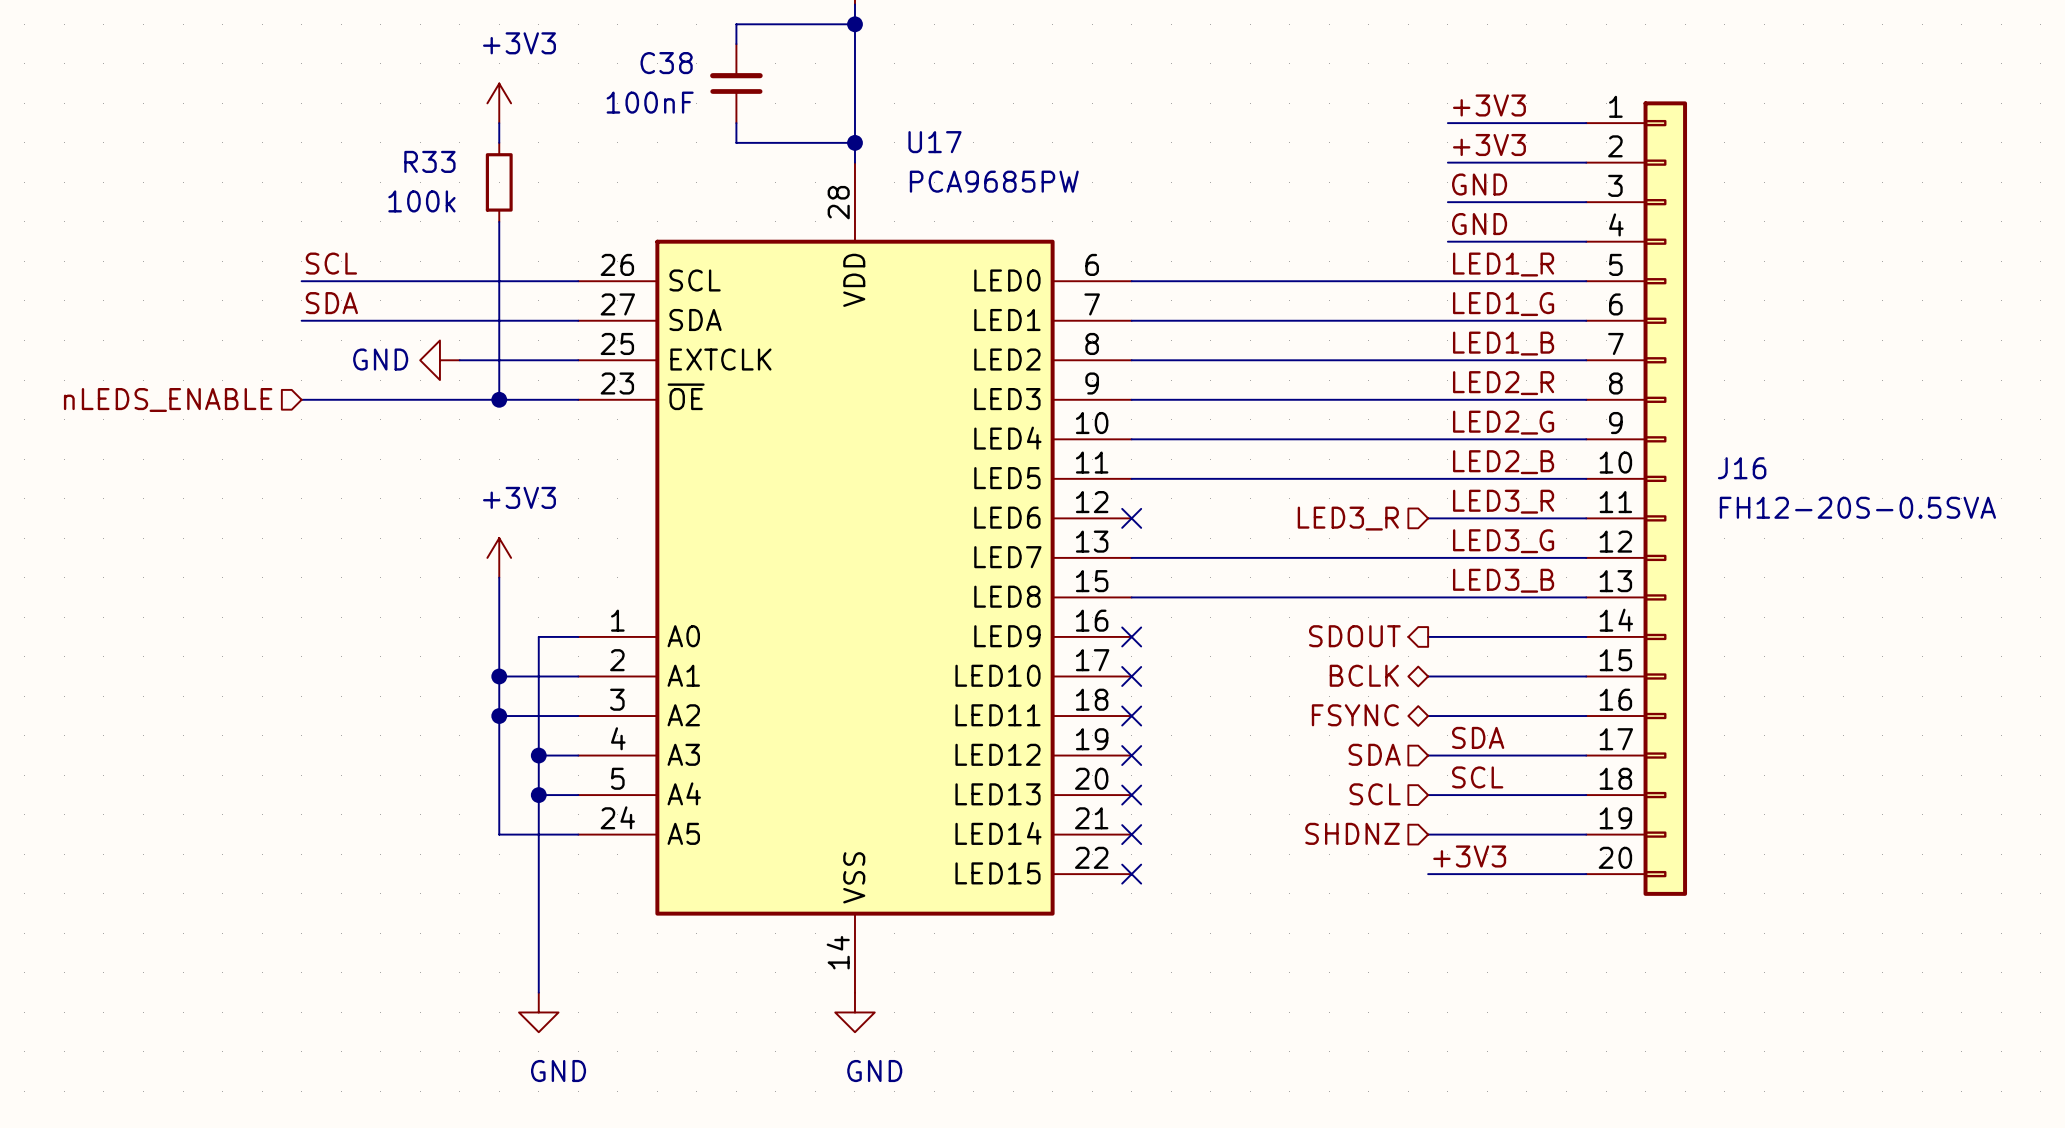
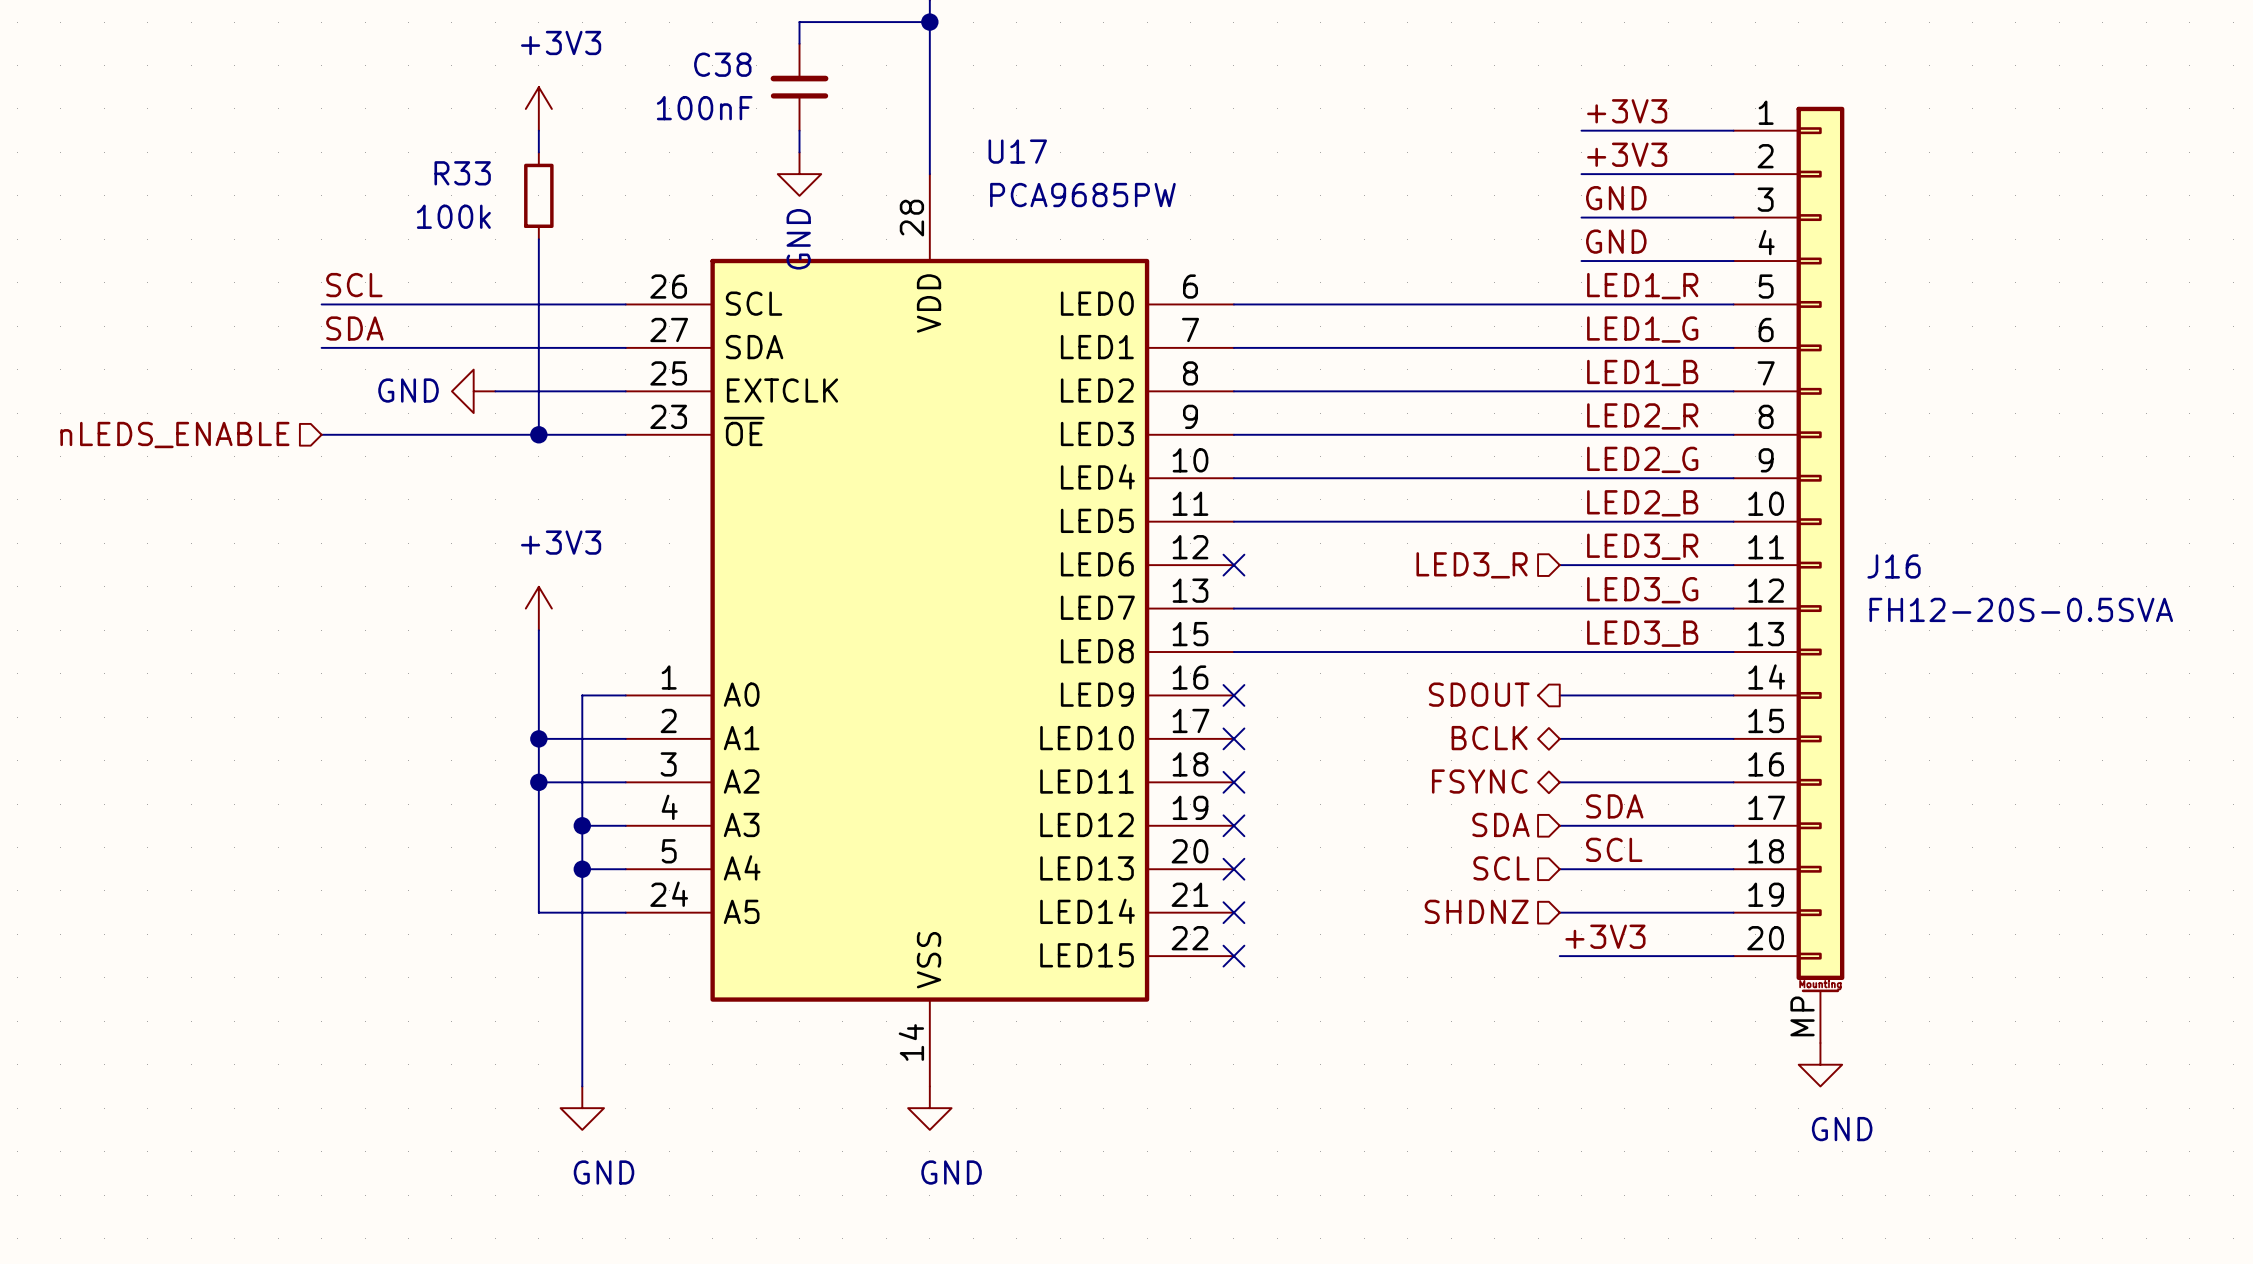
J16 symbol: [1586, 101, 1688, 896] -> [1733, 106, 1845, 1044]
wire: (736, 142) (854, 142) -> none
junction: (854, 142) -> none
power symbol: none -> GND (799, 174)
power symbol: none -> GND (1820, 1064)

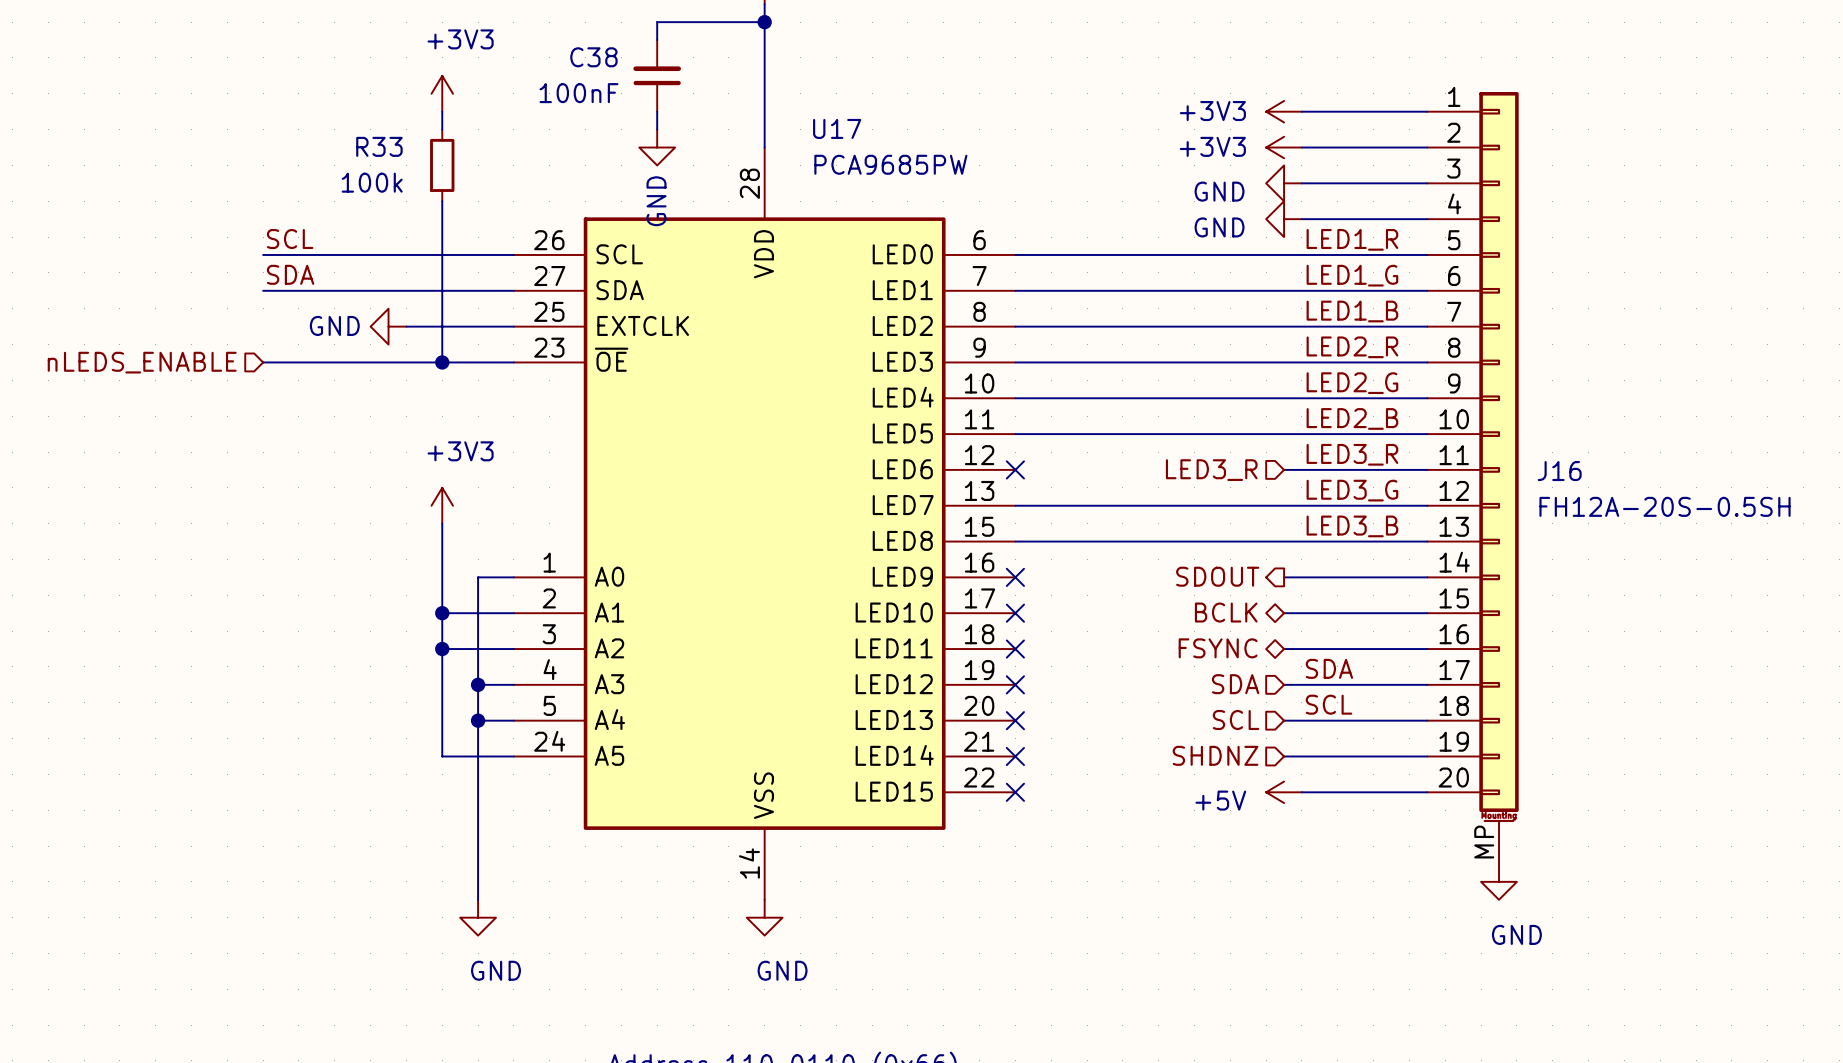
label: +3V3 (1627, 111) -> none
power symbol: none -> +3V3 (1284, 111)
label: +3V3 (1627, 154) -> none
power symbol: none -> +3V3 (1284, 147)
label: GND (1616, 198) -> none
power symbol: none -> GND (1284, 183)
label: GND (1616, 241) -> none
power symbol: none -> GND (1284, 219)
J16 value: FH12-20S-0.5SVA (2021, 609) -> FH12A-20S-0.5SH (1665, 506)
label: +3V3 (1605, 936) -> none
power symbol: none -> +5V (1284, 792)

